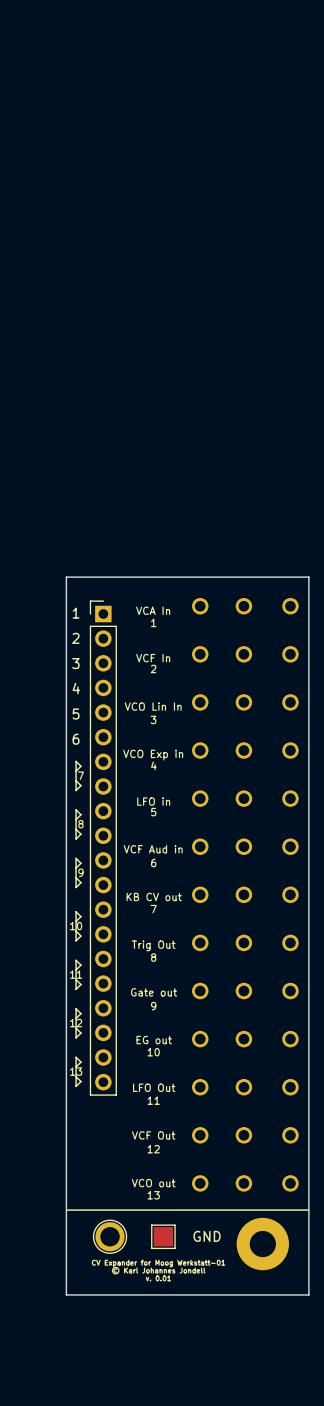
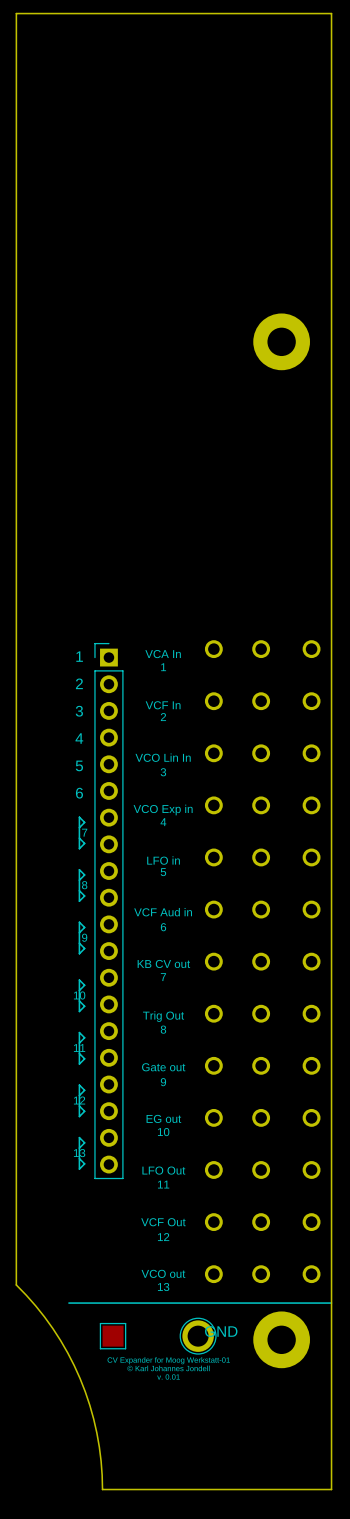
part: none -> (281, 341)
board edge: (308, 577) (66, 577) (66, 1294) (308, 1294) -> (331, 617) (331, 13) (16, 13) (16, 1285) (52, 1328) (80, 1378) (96, 1432) (102, 1489) (331, 1489) (331, 1394)
GND position: (110, 1236) -> (198, 1336)
part position: (163, 1236) -> (113, 1336)

